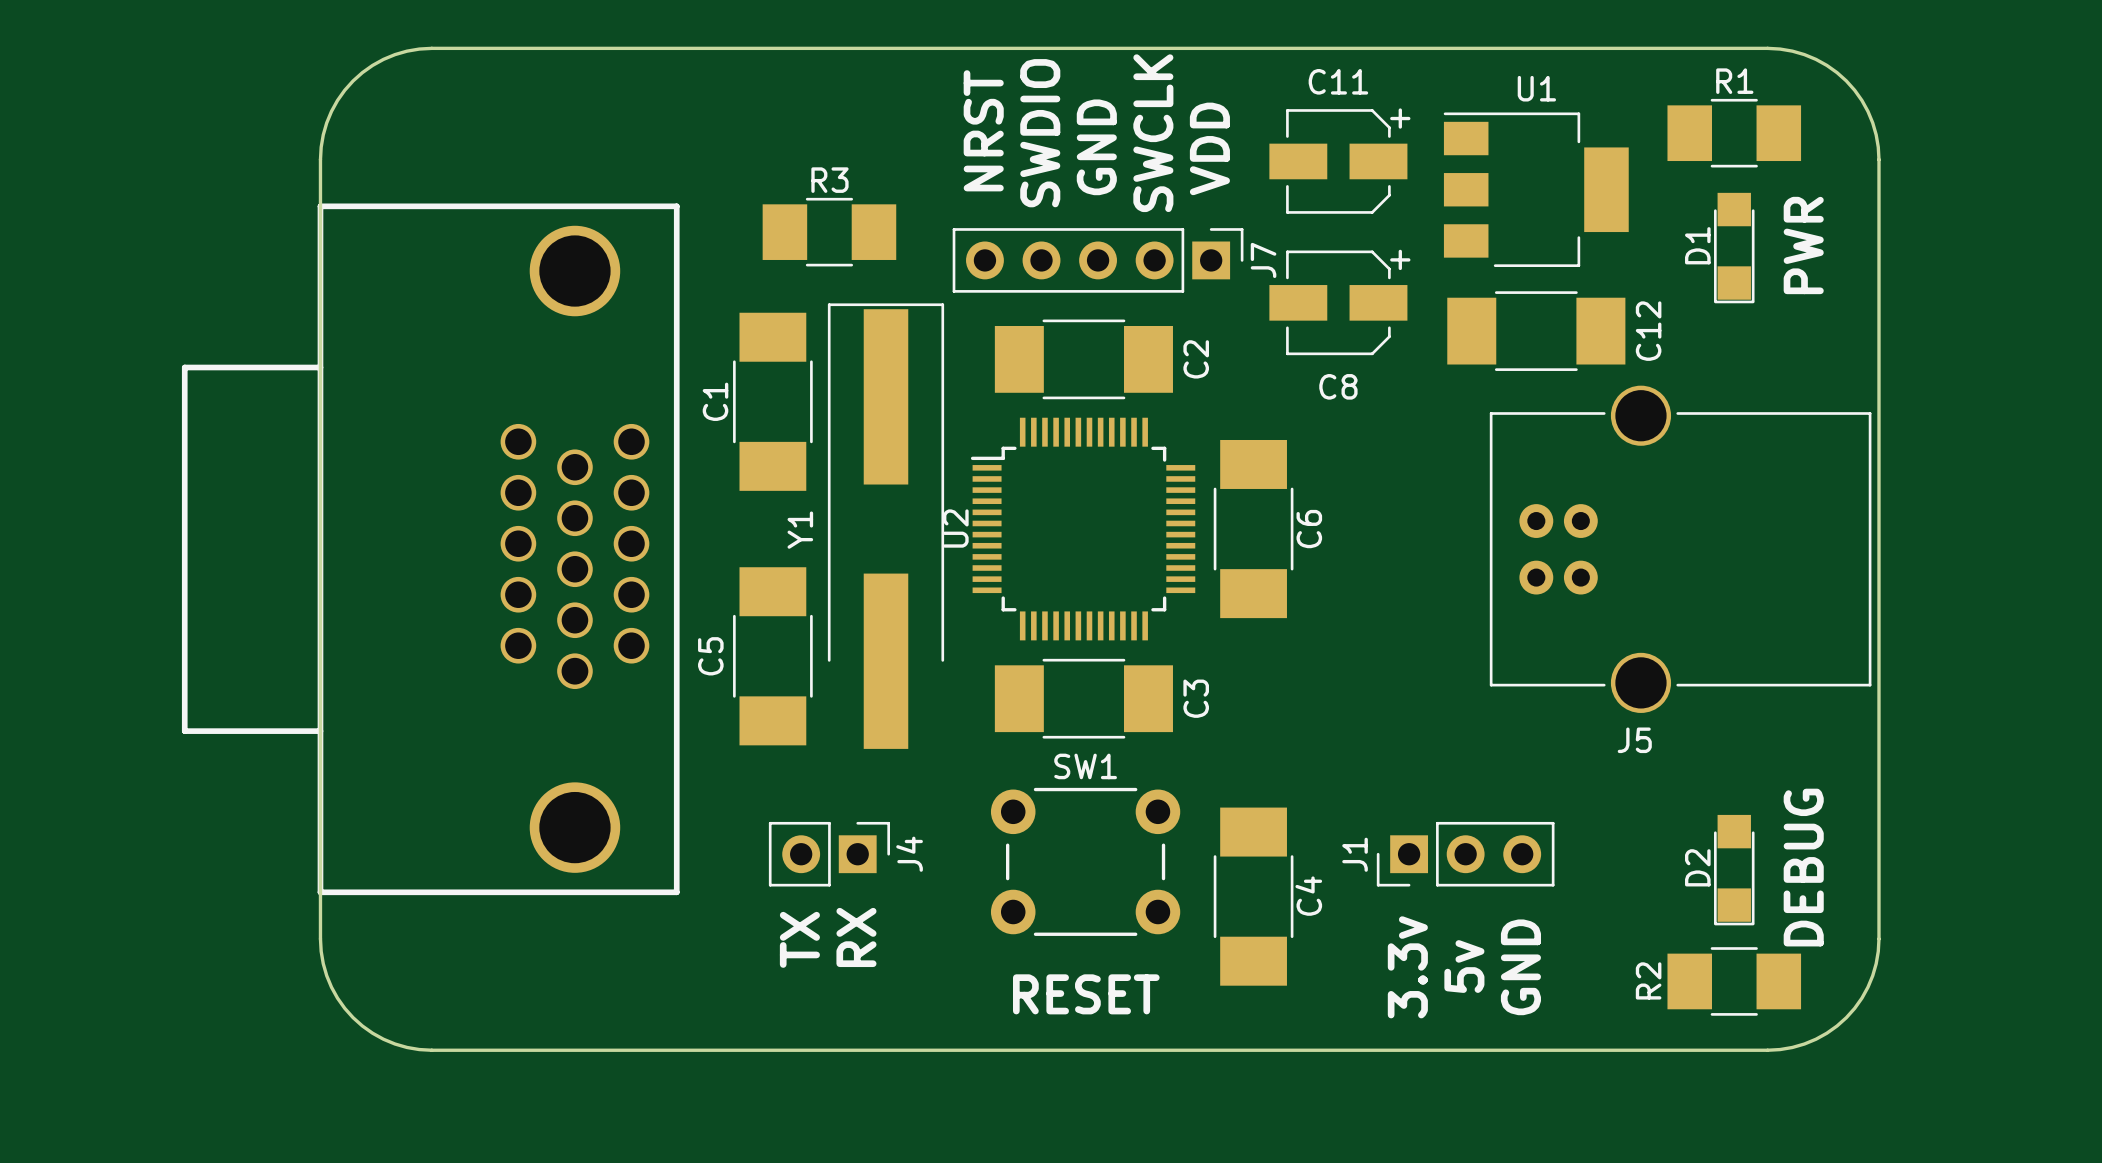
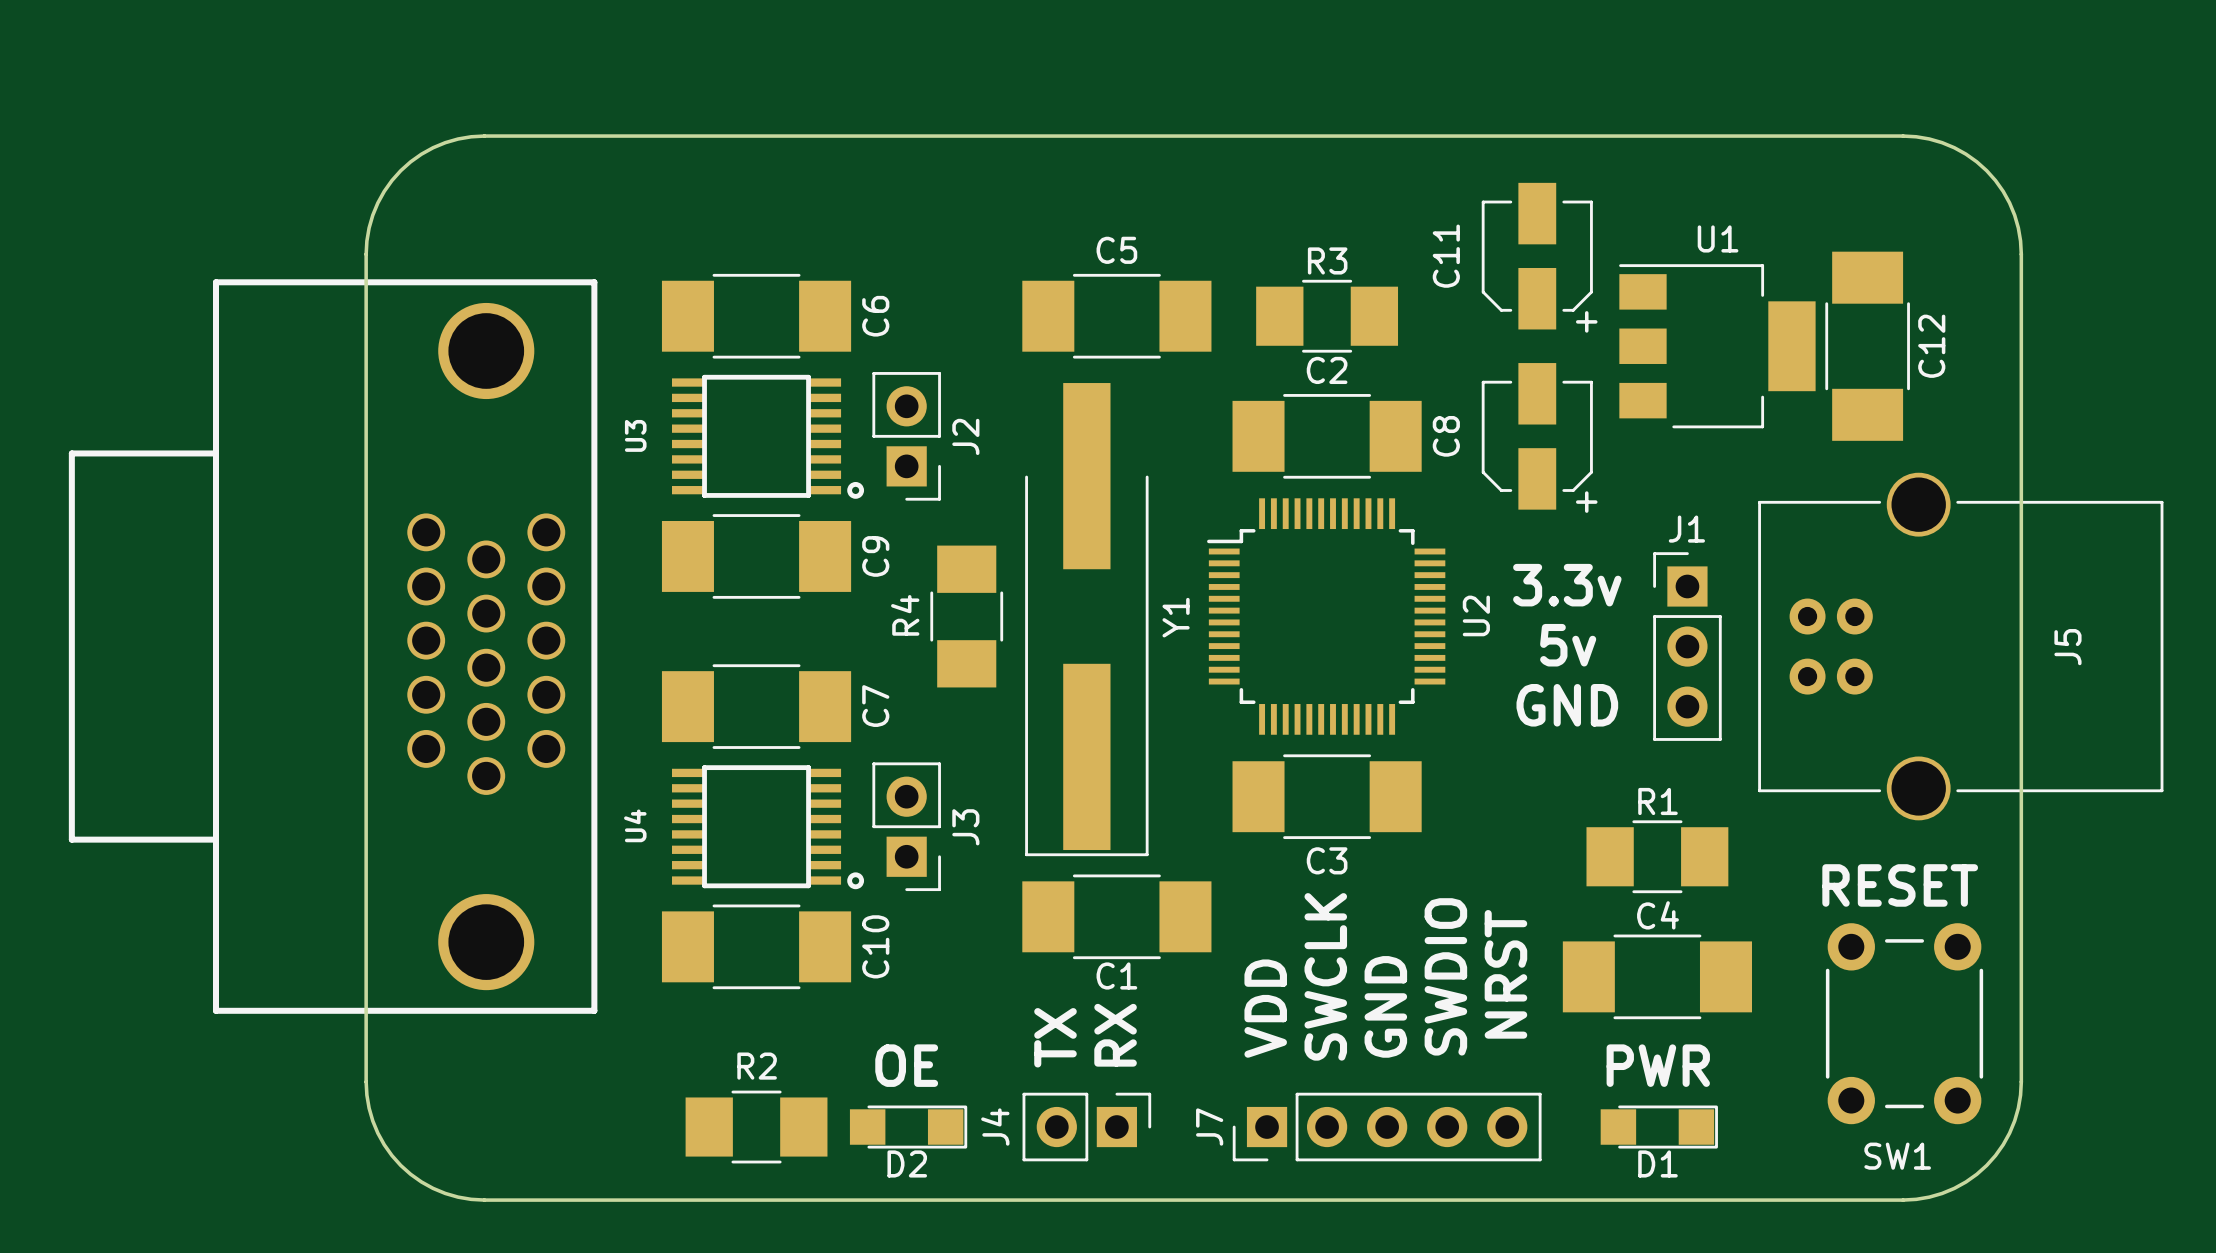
C11 name position: C11 (1338, 81) -> C11 (1446, 256)
text: NRST (983, 130) -> none
text: SWDIO (1040, 133) -> none
text: SWCLK (1153, 133) -> none
R1 position: (1734, 133) -> (1657, 856)
text: GND (1096, 147) -> none
text: VDD (1209, 148) -> none
C11 rotation: 0° (1338, 161) -> 90° clockwise (1537, 256)
C11 position: (1338, 161) -> (1537, 256)
U1 position: (1536, 189) -> (1717, 346)
R3 position: (829, 232) -> (1327, 316)
text: PWR (1803, 245) -> none
D1 rotation: 0° (1734, 248) -> 90° counterclockwise (1659, 1127)
D1 position: (1734, 248) -> (1659, 1127)
J7 rotation: 0° (1098, 260) -> 180° (1387, 1127)
J7 position: (1098, 260) -> (1387, 1127)
C8 rotation: 0° (1338, 302) -> 90° clockwise (1537, 436)
C8 position: (1338, 302) -> (1537, 436)
U3: none -> (768, 436)
J2: none -> (906, 436)
C12 rotation: 0° (1536, 331) -> 90° clockwise (1867, 346)
C12 position: (1536, 331) -> (1867, 346)
C12 name position: C12 (1648, 331) -> C12 (1931, 346)
C2 position: (1083, 359) -> (1327, 436)
C2 name rotation: 0° (1196, 359) -> 90° clockwise (1327, 370)
C2 name position: C2 (1196, 359) -> C2 (1327, 370)
C1 name position: C1 (715, 401) -> C1 (1116, 975)
C1 rotation: 0° (772, 401) -> 90° clockwise (1116, 916)
C1 position: (772, 401) -> (1116, 916)
C9: none -> (756, 556)
R4: none -> (966, 616)
Y1 rotation: 0° (885, 526) -> 180° (1086, 619)
U2 name position: U2 (955, 528) -> U2 (1476, 615)
U2 position: (1083, 529) -> (1326, 616)
C6 rotation: 0° (1253, 529) -> 90° clockwise (756, 316)
C6 position: (1253, 529) -> (756, 316)
C6 name position: C6 (1309, 529) -> C6 (875, 316)
part position: (430, 549) -> (333, 646)
J5 position: (1680, 549) -> (1960, 646)
text: none -> GND (1567, 705)
C7: none -> (756, 706)
C5 rotation: 0° (772, 656) -> 90° clockwise (1116, 316)
C5 position: (772, 656) -> (1116, 316)
J3: none -> (906, 826)
C3 position: (1083, 698) -> (1327, 796)
C3 name rotation: 0° (1196, 698) -> 90° clockwise (1327, 860)
U4: none -> (768, 827)
J5 name rotation: 0° (1634, 740) -> 90° counterclockwise (2067, 647)
J5 name position: J5 (1634, 740) -> J5 (2067, 647)
text: none -> RESET (1900, 885)
SW1 name position: SW1 (1085, 766) -> SW1 (1897, 1156)
C10: none -> (756, 946)
text: none -> NRST (1505, 974)
text: none -> SWCLK (1325, 976)
text: none -> SWDIO (1445, 976)
J4 position: (829, 854) -> (1086, 1127)
J4 name position: J4 (909, 854) -> J4 (995, 1127)
J1 rotation: 0° (1465, 854) -> 90° clockwise (1687, 646)
J1 position: (1465, 854) -> (1687, 646)
SW1 rotation: 0° (1085, 861) -> 90° clockwise (1904, 1023)
SW1 position: (1085, 861) -> (1904, 1023)
text: DEBUG (1803, 867) -> none
text: none -> GND (1385, 1006)
text: none -> VDD (1265, 1008)
D2 rotation: 0° (1734, 870) -> 90° counterclockwise (908, 1127)
D2 position: (1734, 870) -> (908, 1127)
C4 rotation: 0° (1253, 896) -> 90° clockwise (1657, 976)
C4 position: (1253, 896) -> (1657, 976)
C4 name position: C4 (1308, 896) -> C4 (1657, 915)
text: none -> OE (906, 1065)
text: none -> PWR (1658, 1065)
text position: RX (856, 937) -> RX (1115, 1035)
text position: TX (799, 939) -> TX (1055, 1037)
text rotation: 0° (1464, 966) -> 90° clockwise (1568, 645)
text position: 5v (1464, 966) -> 5v (1568, 645)
text rotation: 0° (1407, 967) -> 90° clockwise (1567, 585)
text position: 3.3v (1407, 967) -> 3.3v (1567, 585)
text: GND (1520, 967) -> none
R2 name rotation: 0° (1648, 980) -> 90° clockwise (757, 1066)
R2 name position: R2 (1648, 980) -> R2 (757, 1066)
R2 position: (1734, 981) -> (756, 1127)
text: RESET (1086, 994) -> none

